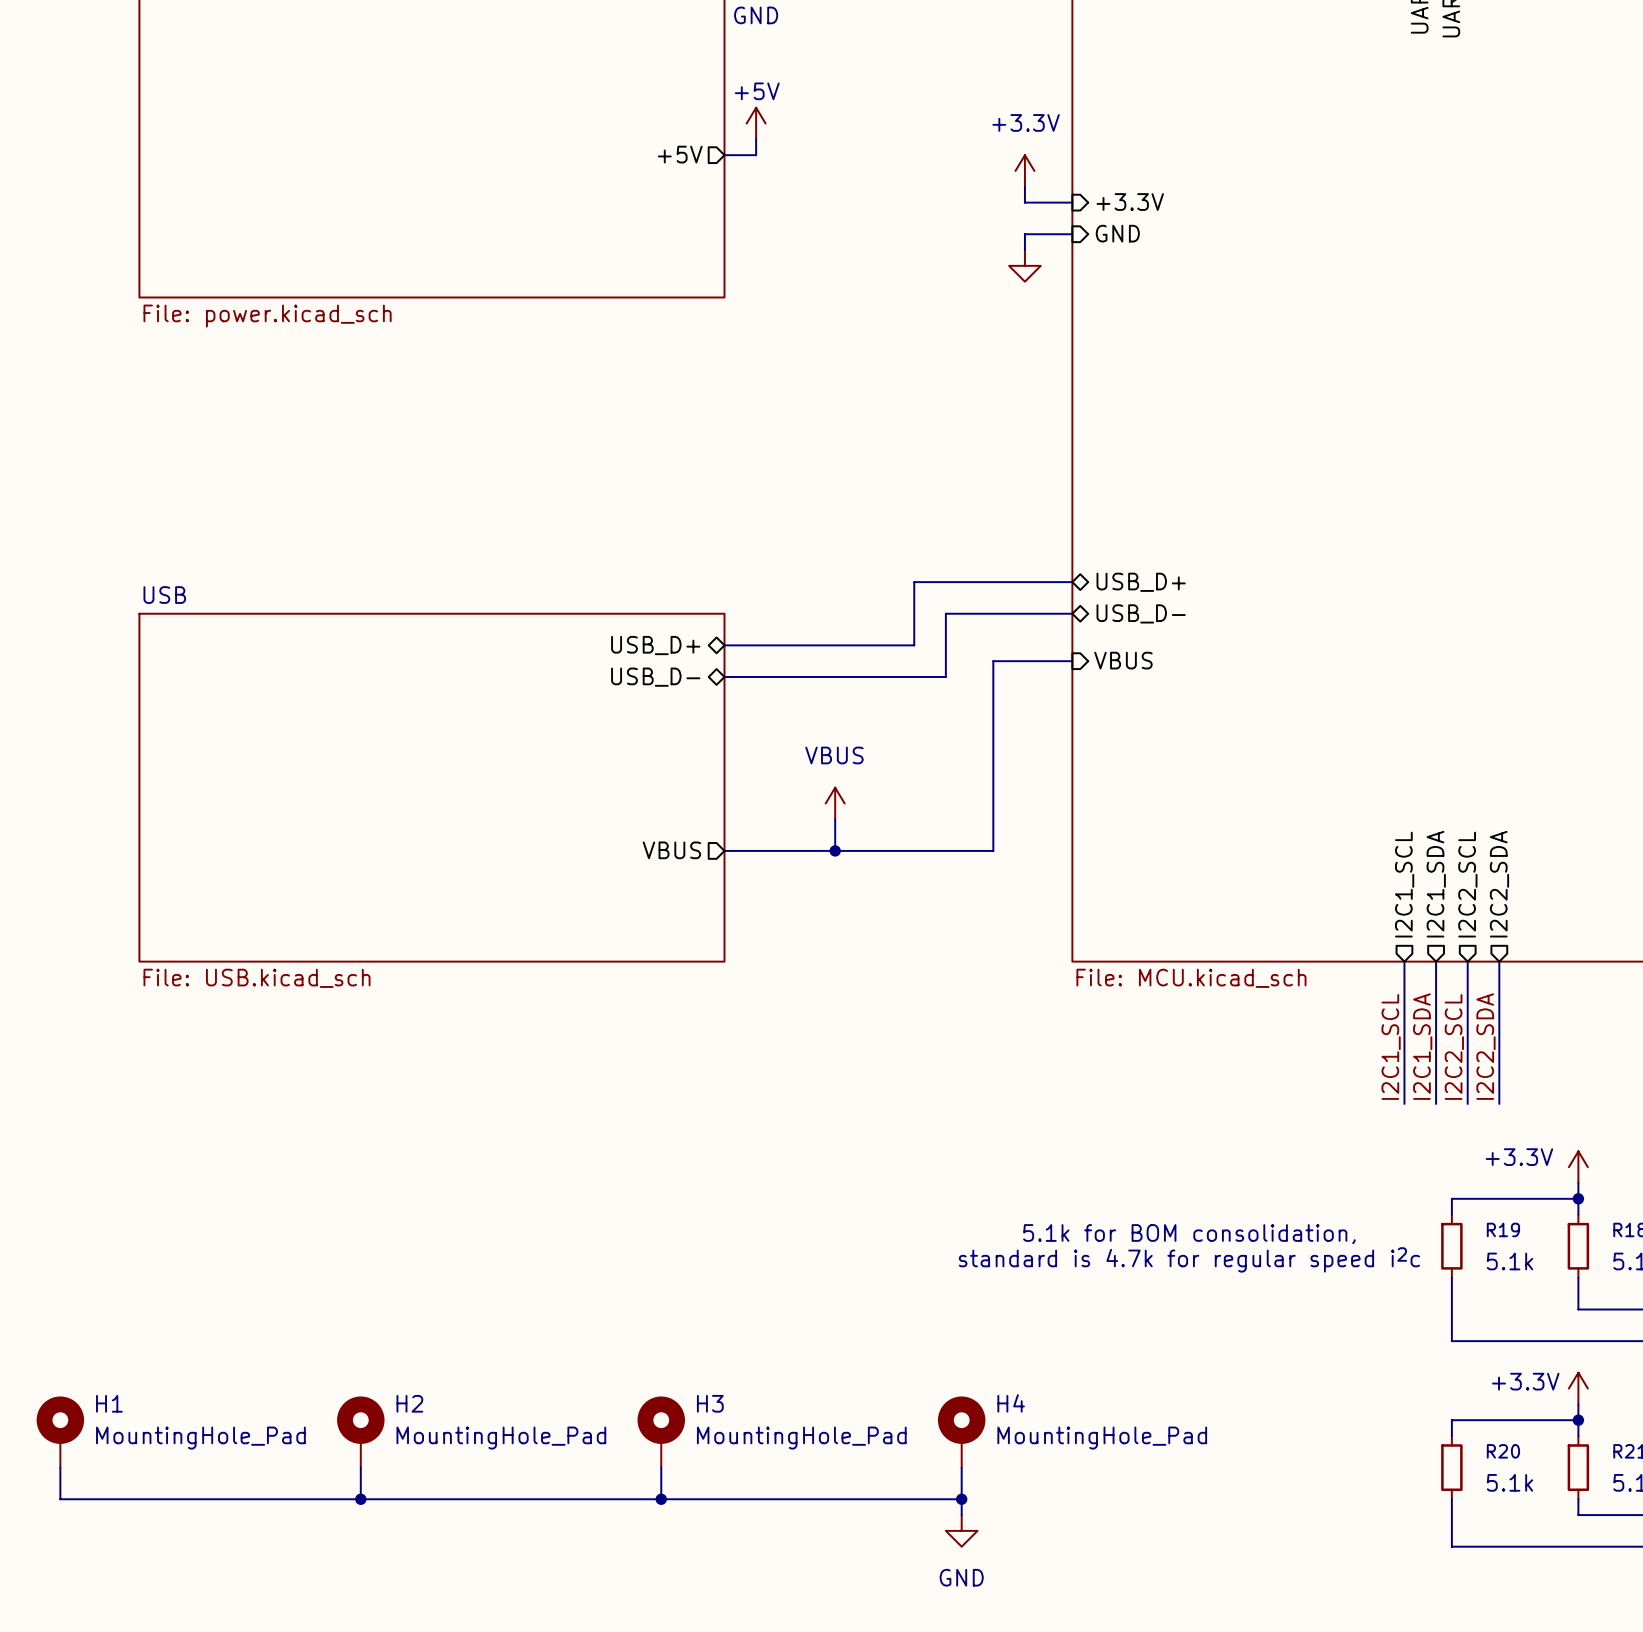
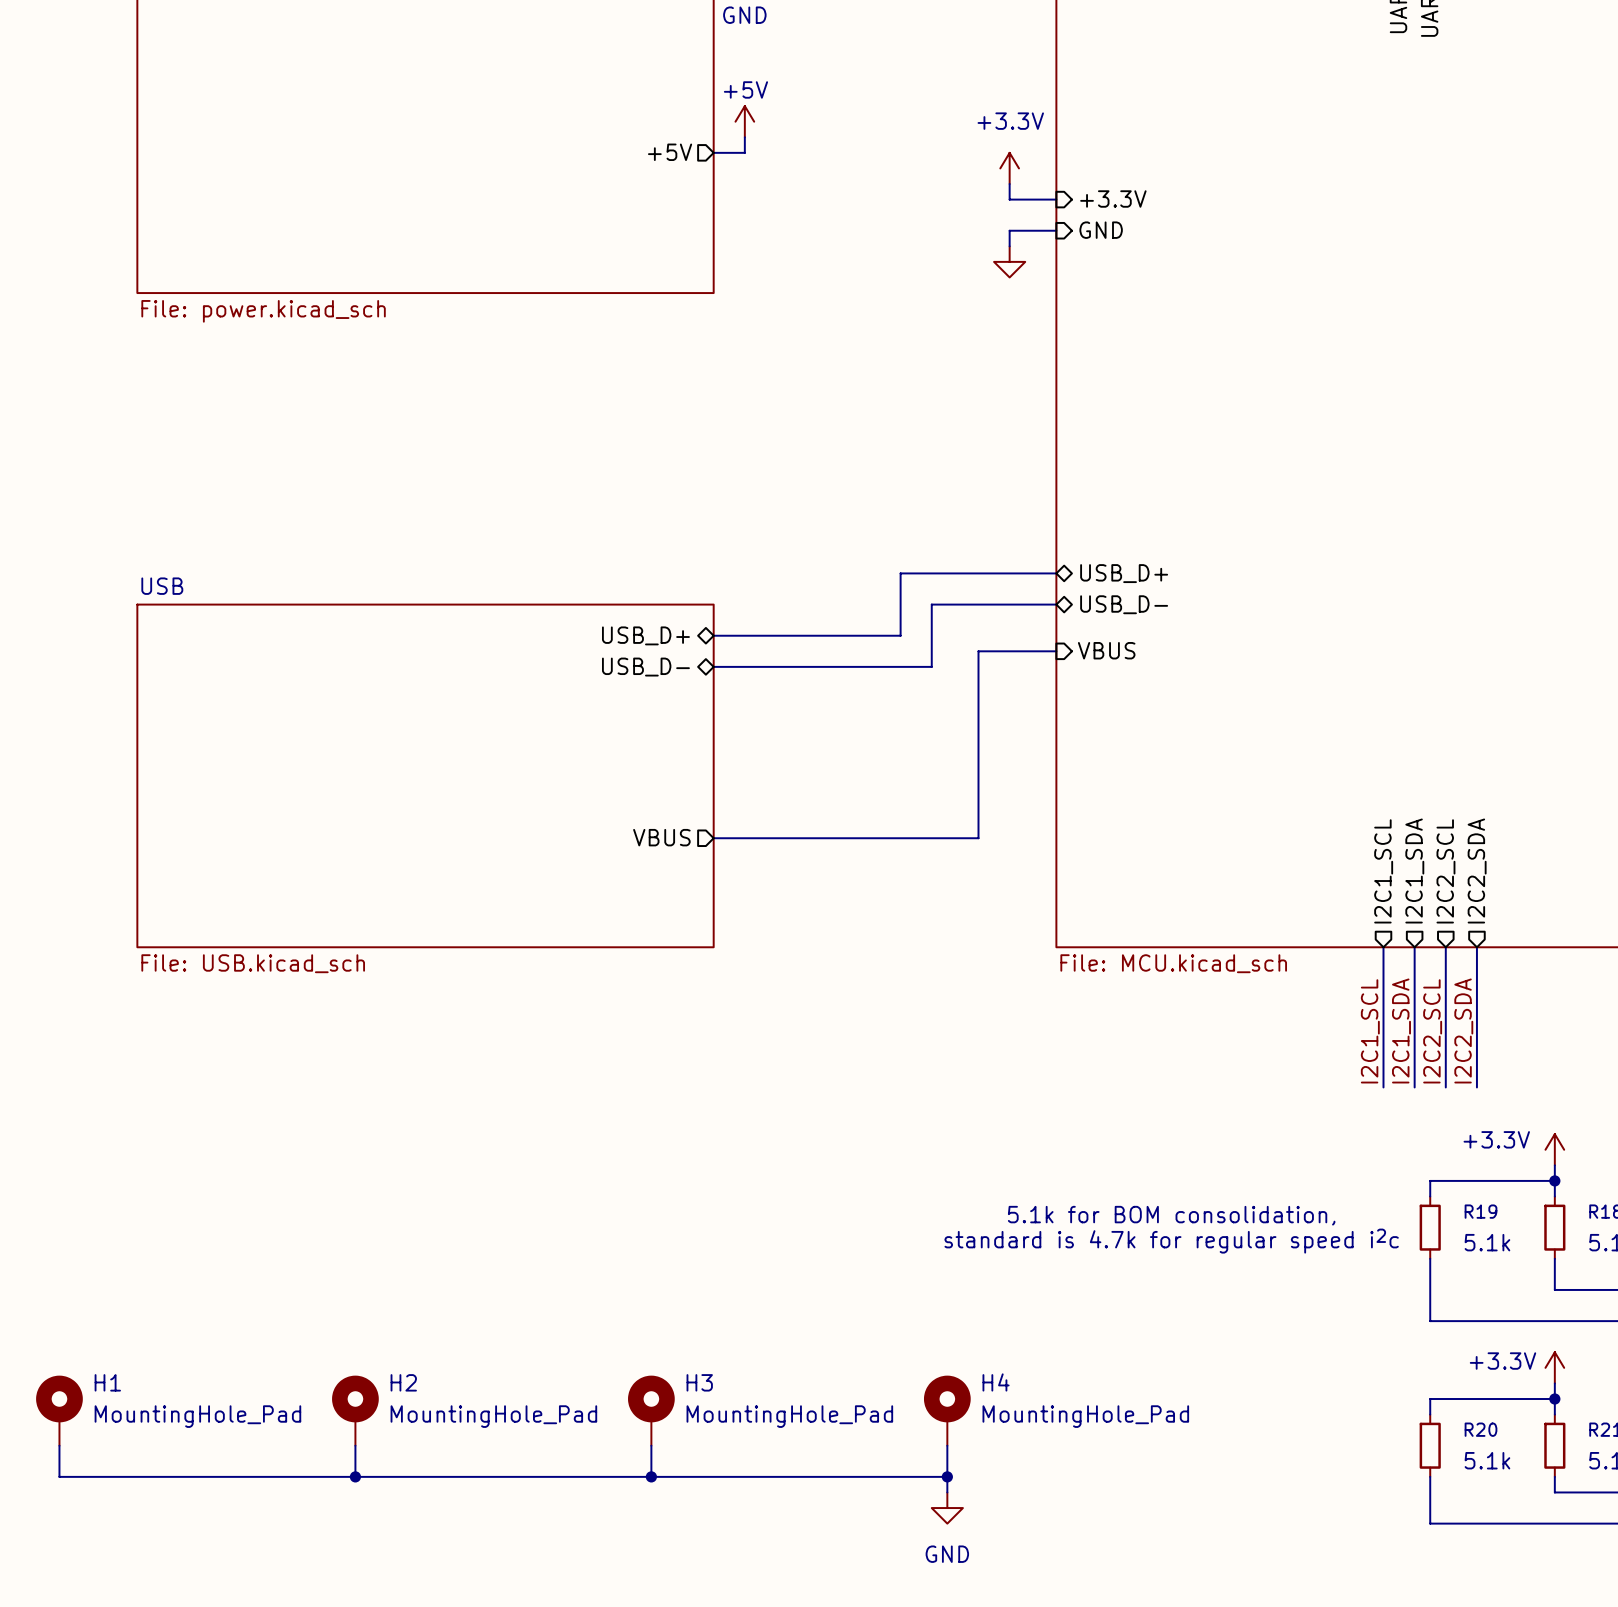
power symbol: VBUS (835, 803) -> none
wire: (835, 819) (835, 850) -> none
junction: (835, 850) -> none

